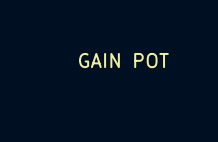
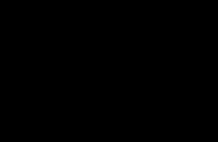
text: GAIN POT (123, 60) -> none

